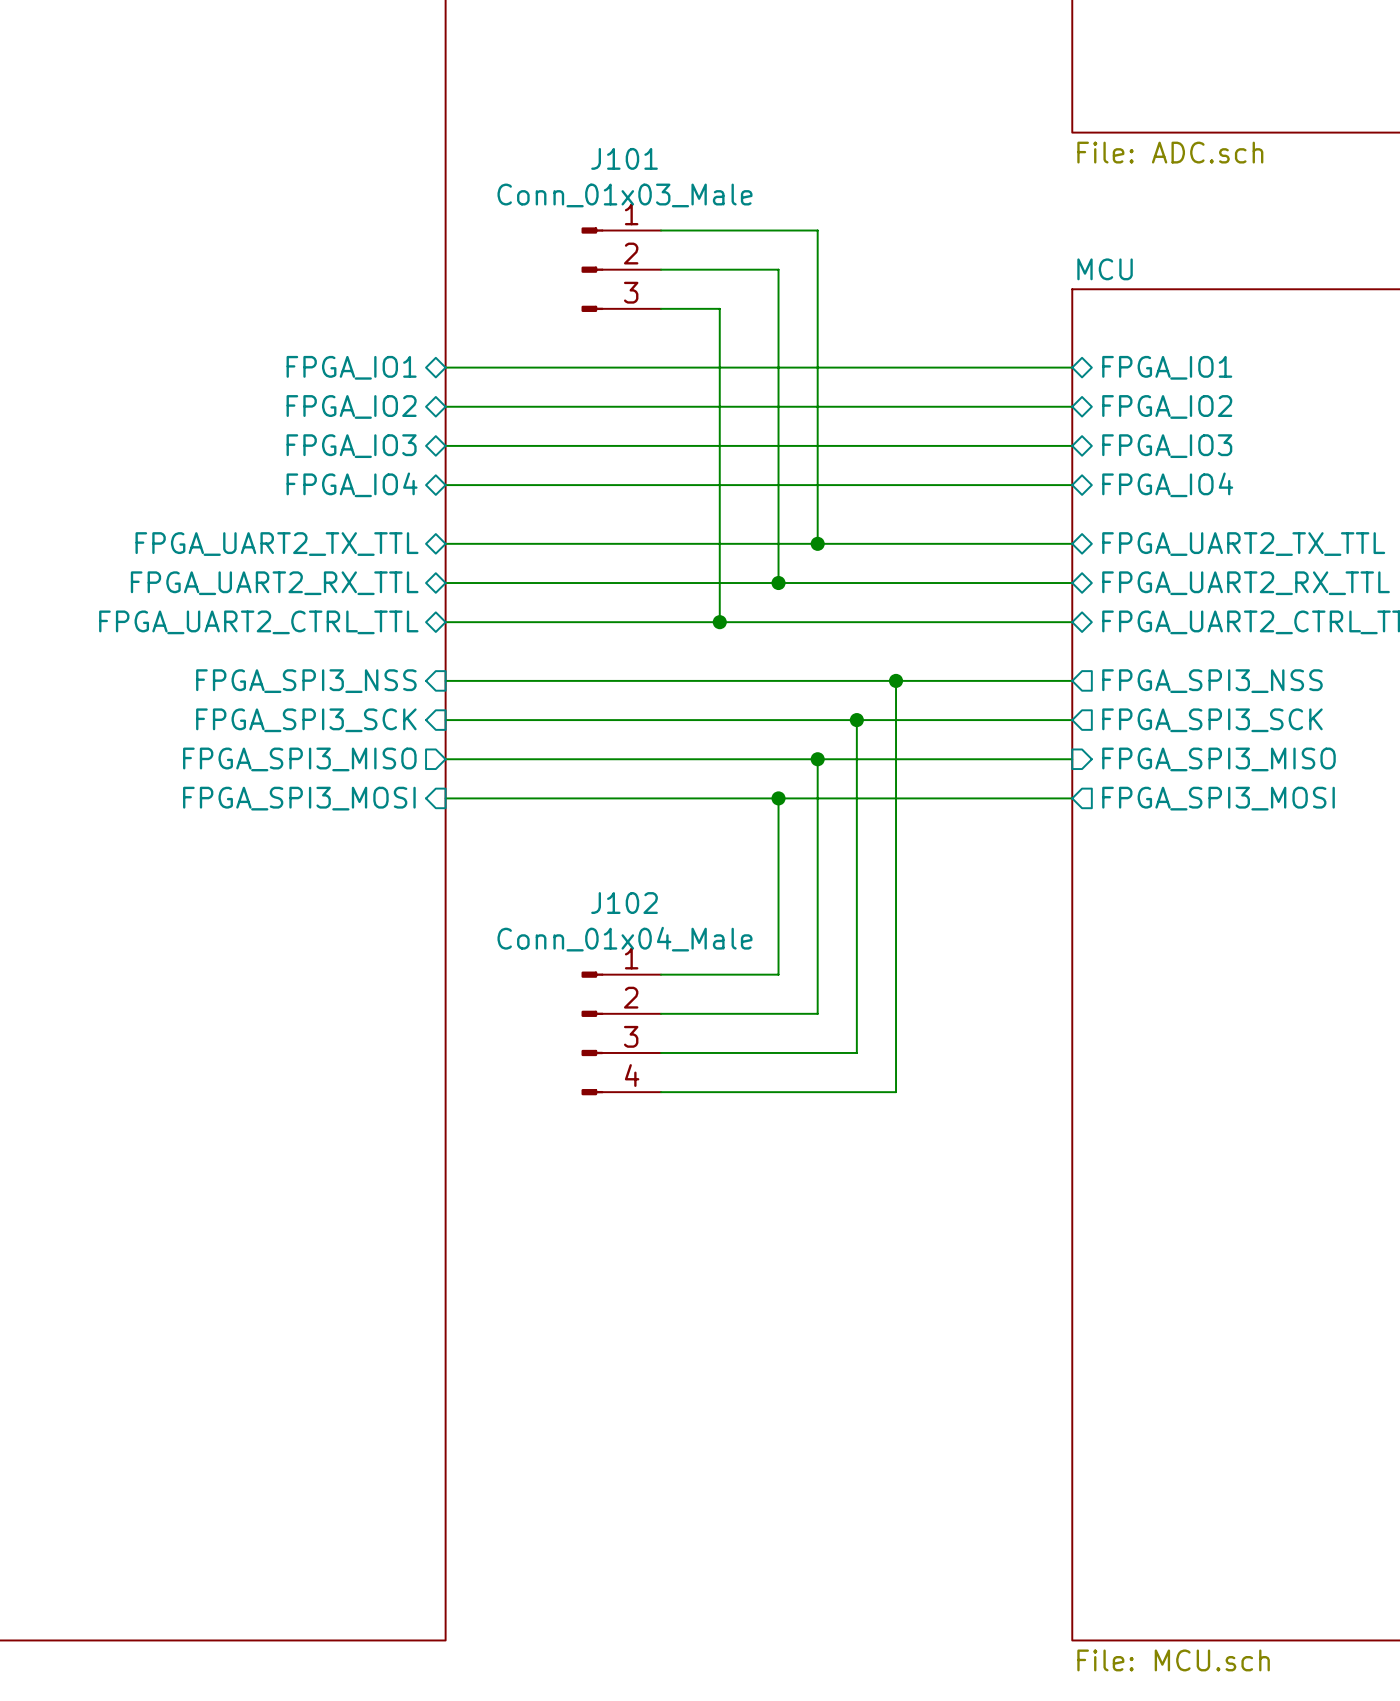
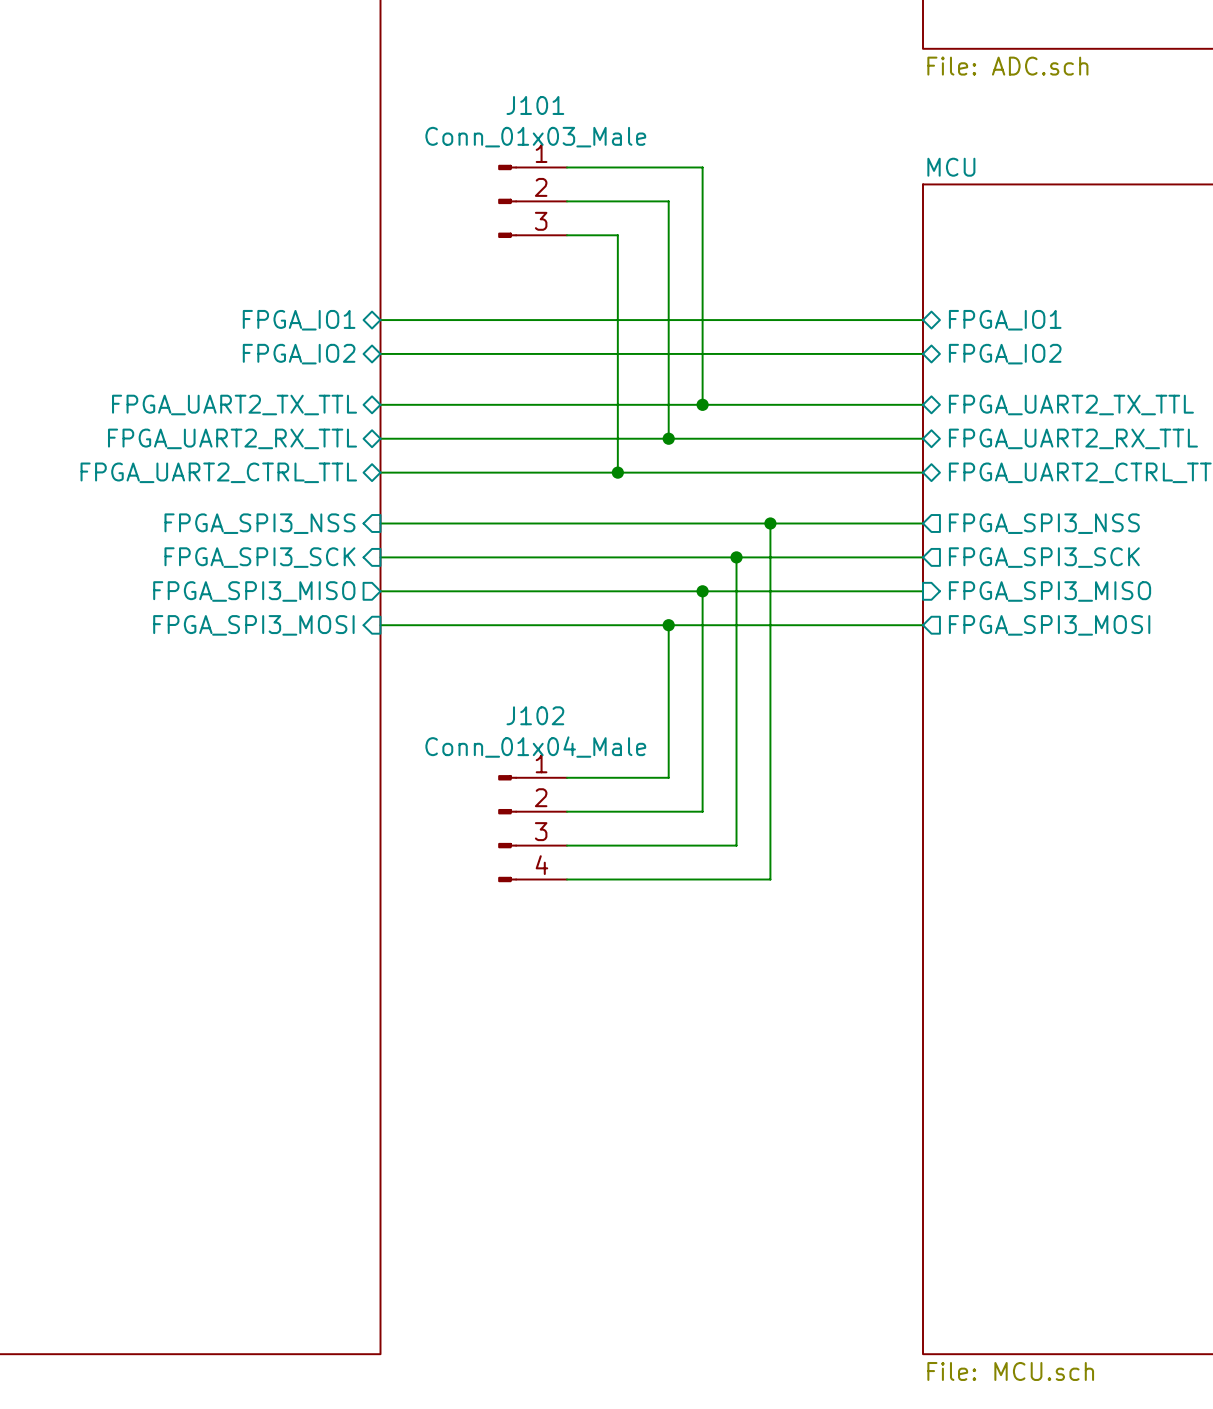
wire: (661, 230) (817, 230) (817, 269) -> none
J101 position: (621, 269) -> (532, 201)
wire: (778, 269) (778, 308) -> (668, 167) (702, 167)
wire: (719, 308) (719, 348) -> (617, 201) (668, 201)
wire: none -> (566, 235) (617, 235)
sheet pin: FPGA_IO1 (351, 367) -> none
wire: (445, 367) (1072, 367) -> none
sheet pin: FPGA_IO1 (1167, 367) -> none
sheet pin: FPGA_IO2 (351, 406) -> none
wire: (445, 406) (1072, 406) -> none
sheet pin: FPGA_IO2 (1167, 406) -> none
sheet pin: FPGA_IO3 (351, 446) -> FPGA_IO1 (299, 320)
sheet pin: FPGA_IO3 (1167, 446) -> FPGA_IO1 (1005, 320)
sheet pin: FPGA_IO4 (352, 484) -> FPGA_IO2 (299, 354)
sheet pin: FPGA_IO4 (1167, 484) -> FPGA_IO2 (1005, 354)

